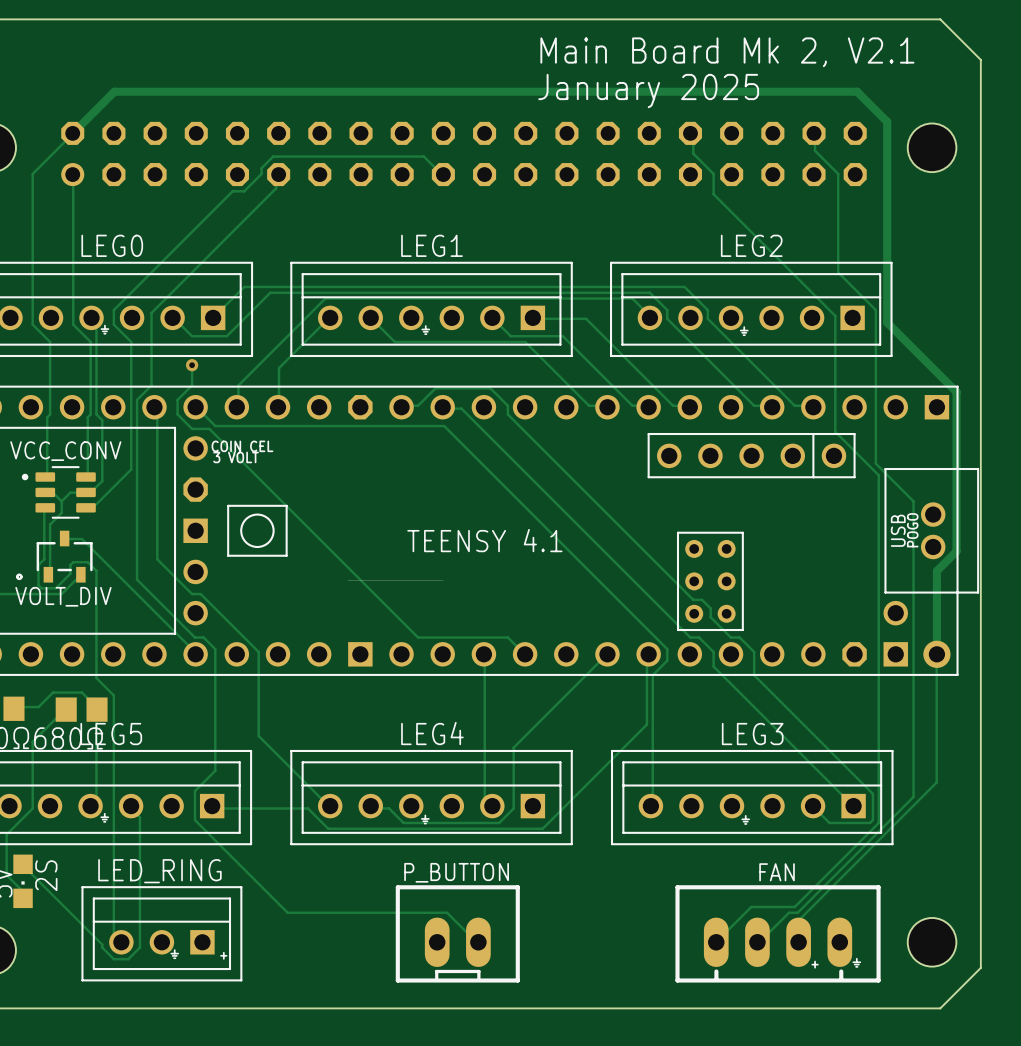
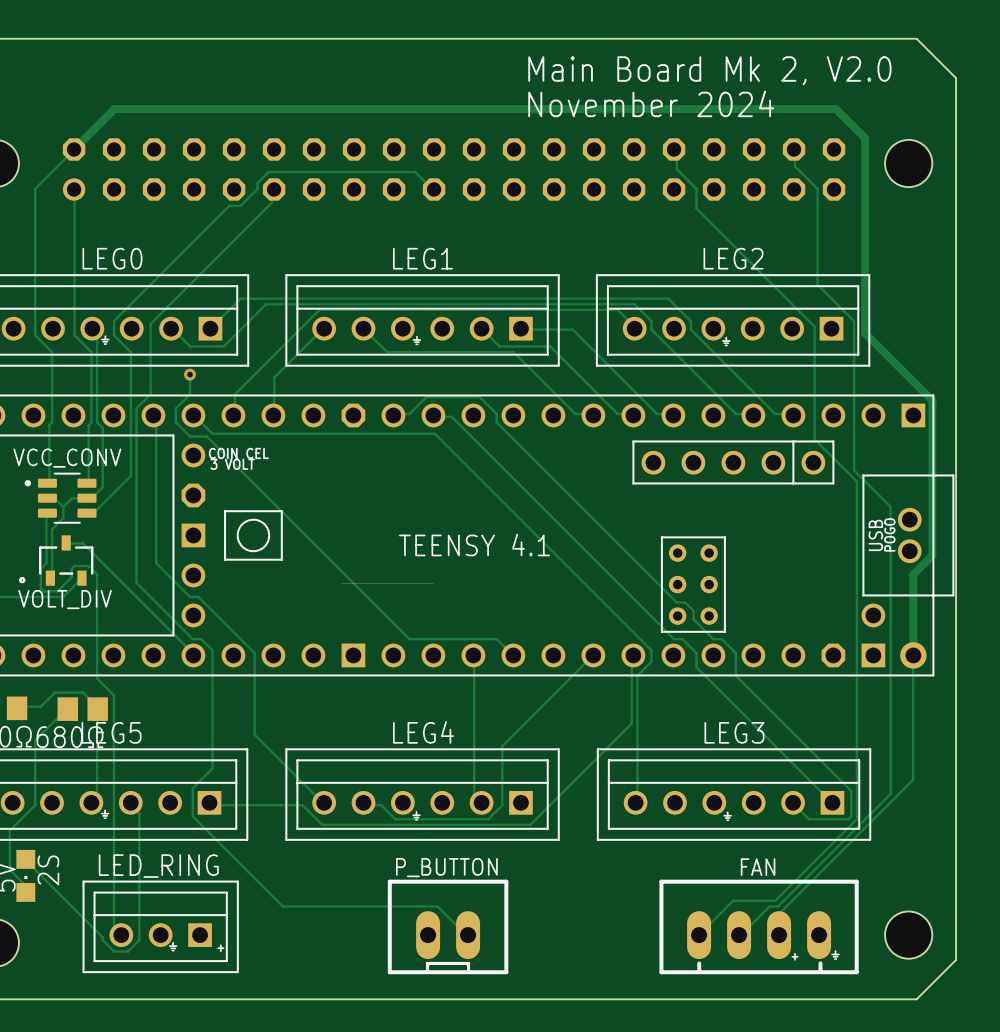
text: Main Board Mk 2, V2.1 (727, 52) -> Main Board Mk 2, V2.0 (709, 70)
text: January 2025 (648, 91) -> November 2024 (651, 103)

